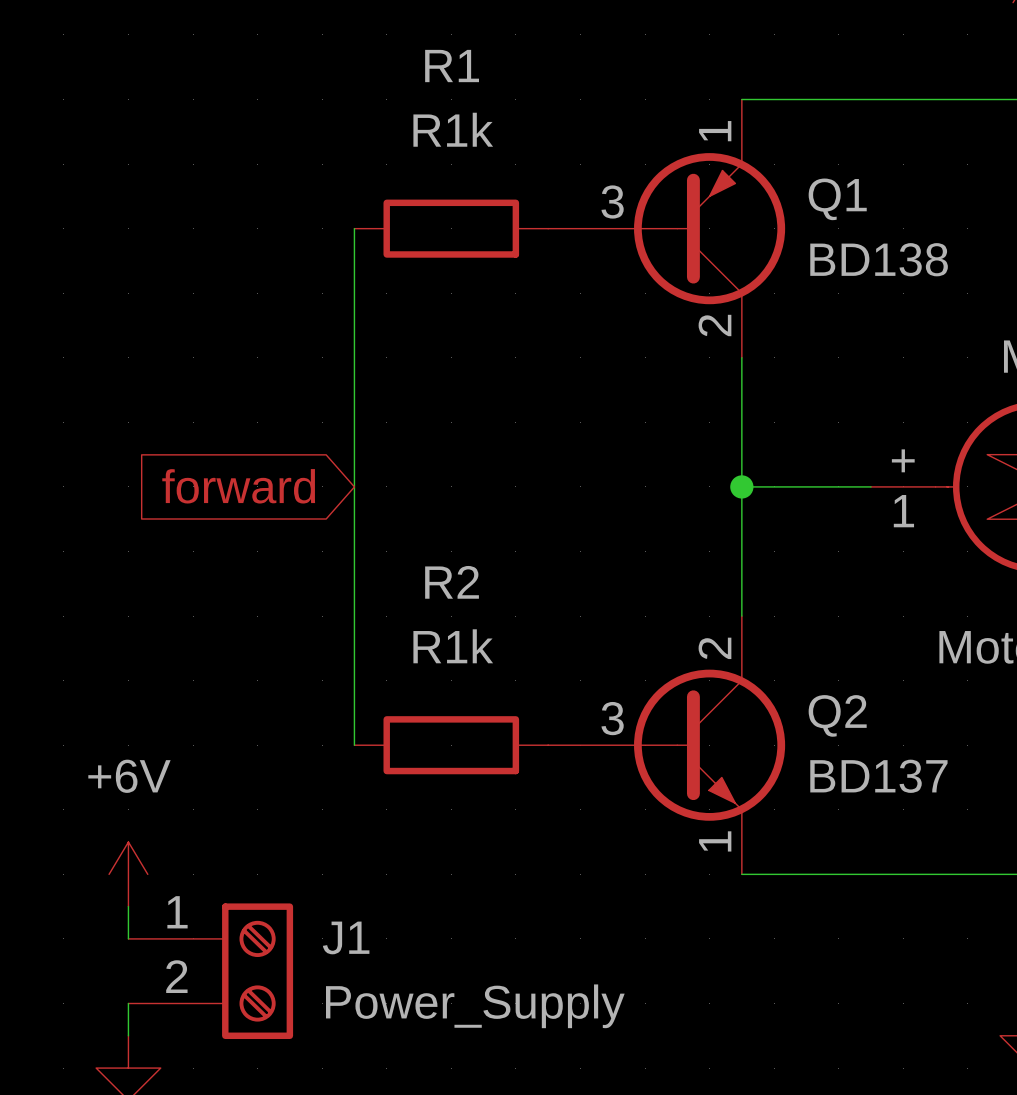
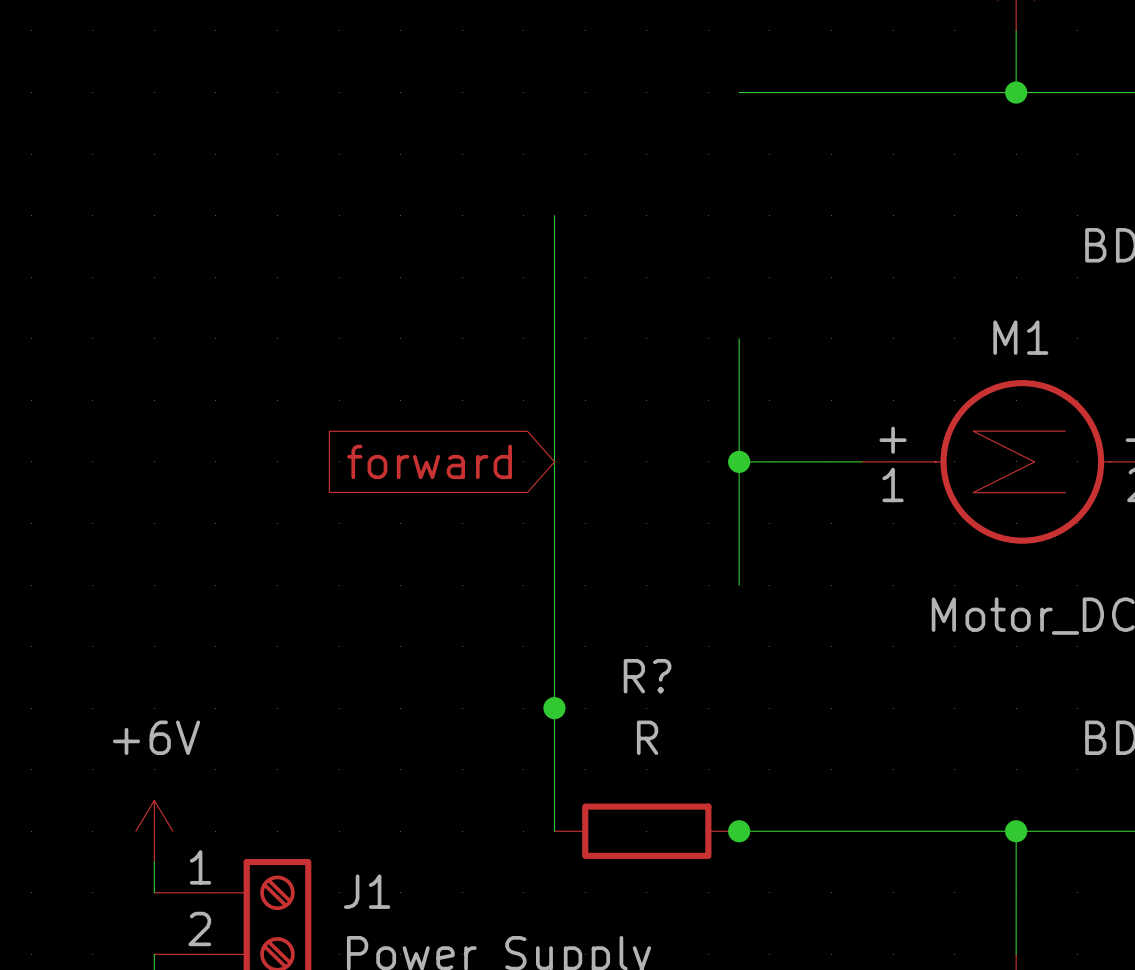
wire: (354, 228) (354, 745) -> none
R1: R1k (451, 228) -> none
wire: none -> (554, 215) (554, 831)
Q1: BD138 (666, 228) -> none
global label position: forward (238, 486) -> forward (429, 461)
R2: R1k (451, 745) -> none
junction: none -> (554, 708)
Q2: BD137 (666, 745) -> none
R?: none -> R (646, 831)
junction: none -> (739, 831)

